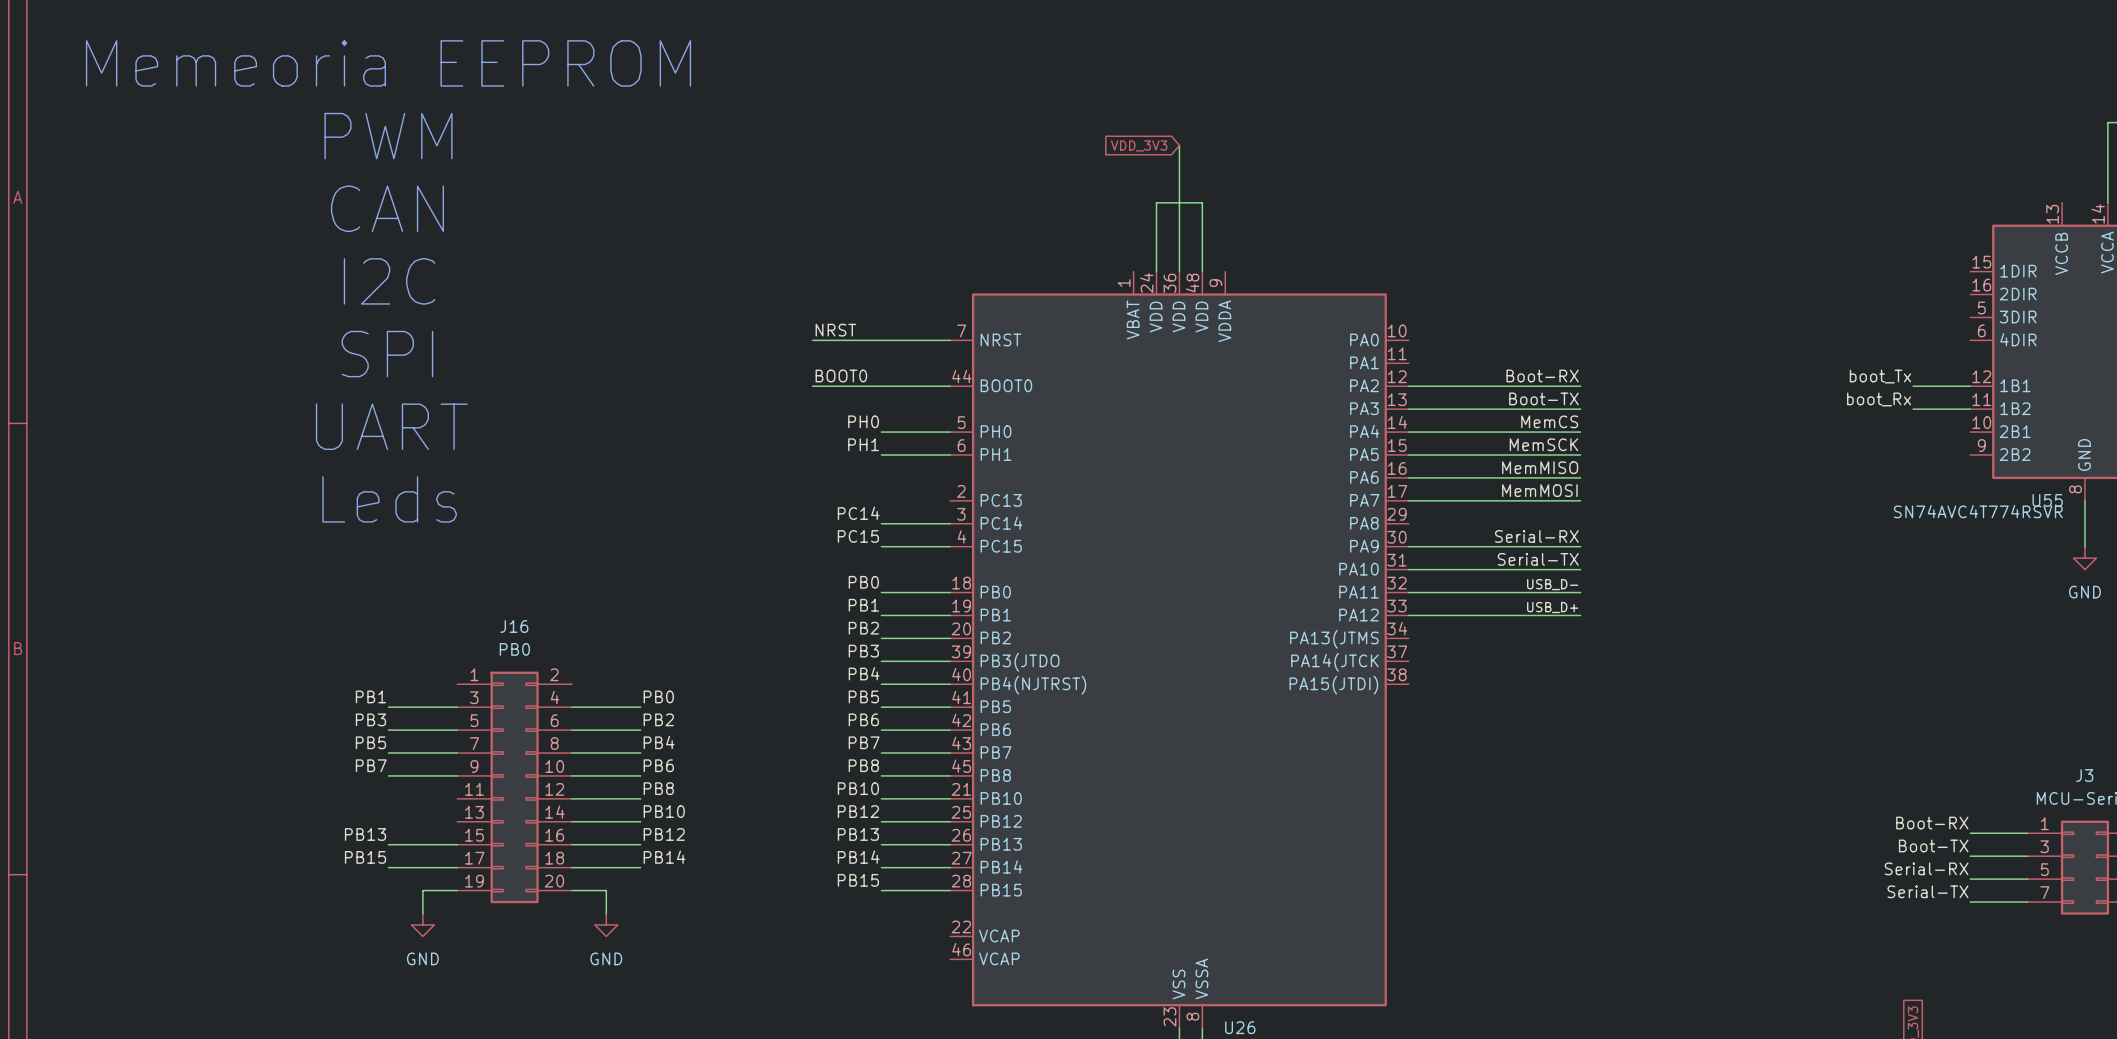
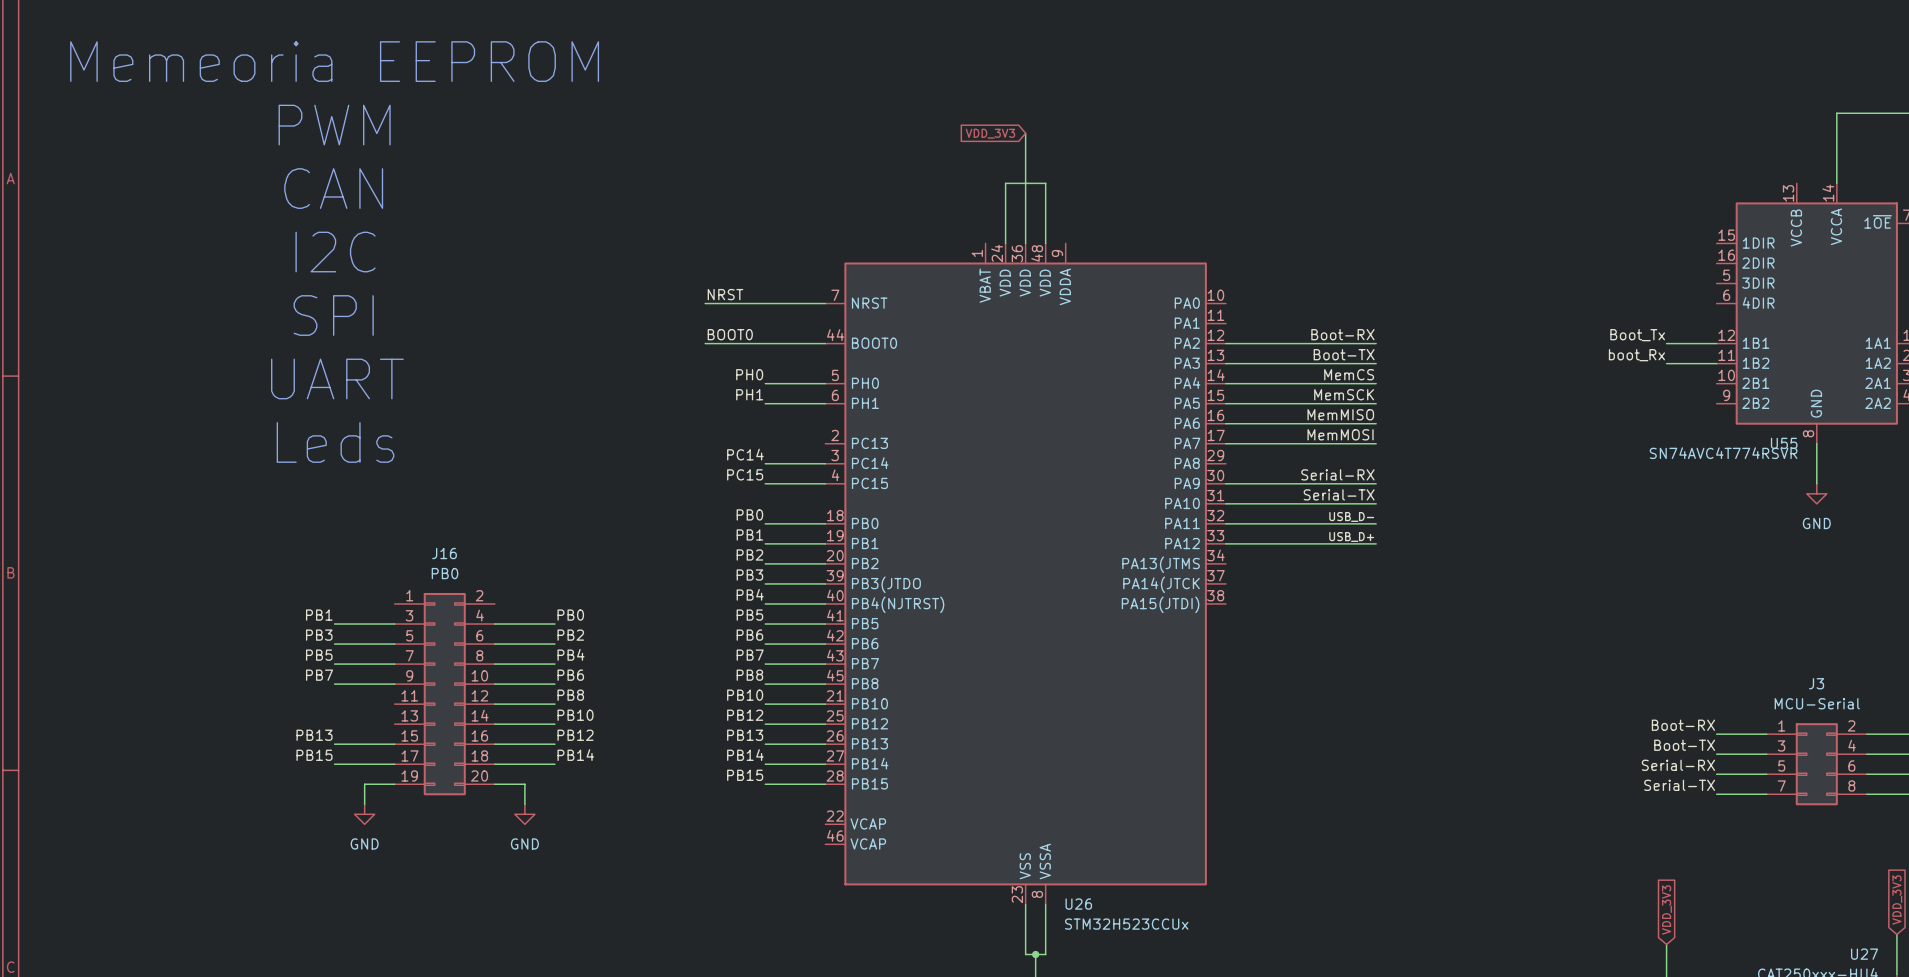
label: boot_Tx (1880, 376) -> Boot_Tx (1637, 335)

